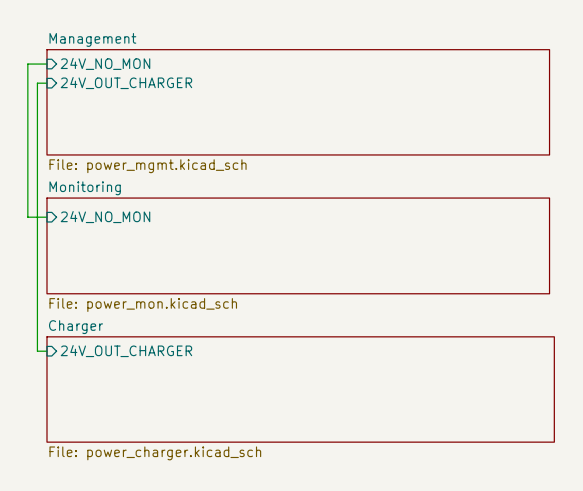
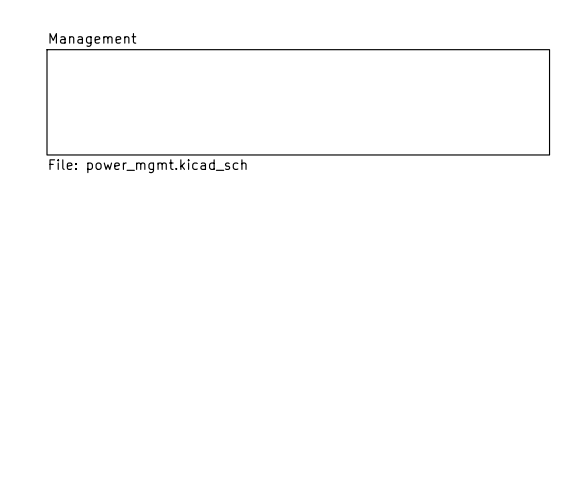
sheet pin: 24V_NO_MON (105, 63) -> none
wire: (46, 64) (27, 64) (27, 217) (46, 217) -> none
wire: (46, 83) (37, 83) (37, 351) (46, 351) -> none
sheet pin: 24V_OUT_CHARGER (126, 83) -> none
sheet pin: 24V_NO_MON (105, 217) -> none
sheet Monitoring: File: power_mon.kicad_sch (298, 245) -> none
sheet pin: 24V_OUT_CHARGER (126, 351) -> none
sheet Charger: File: power_charger.kicad_sch (300, 389) -> none

